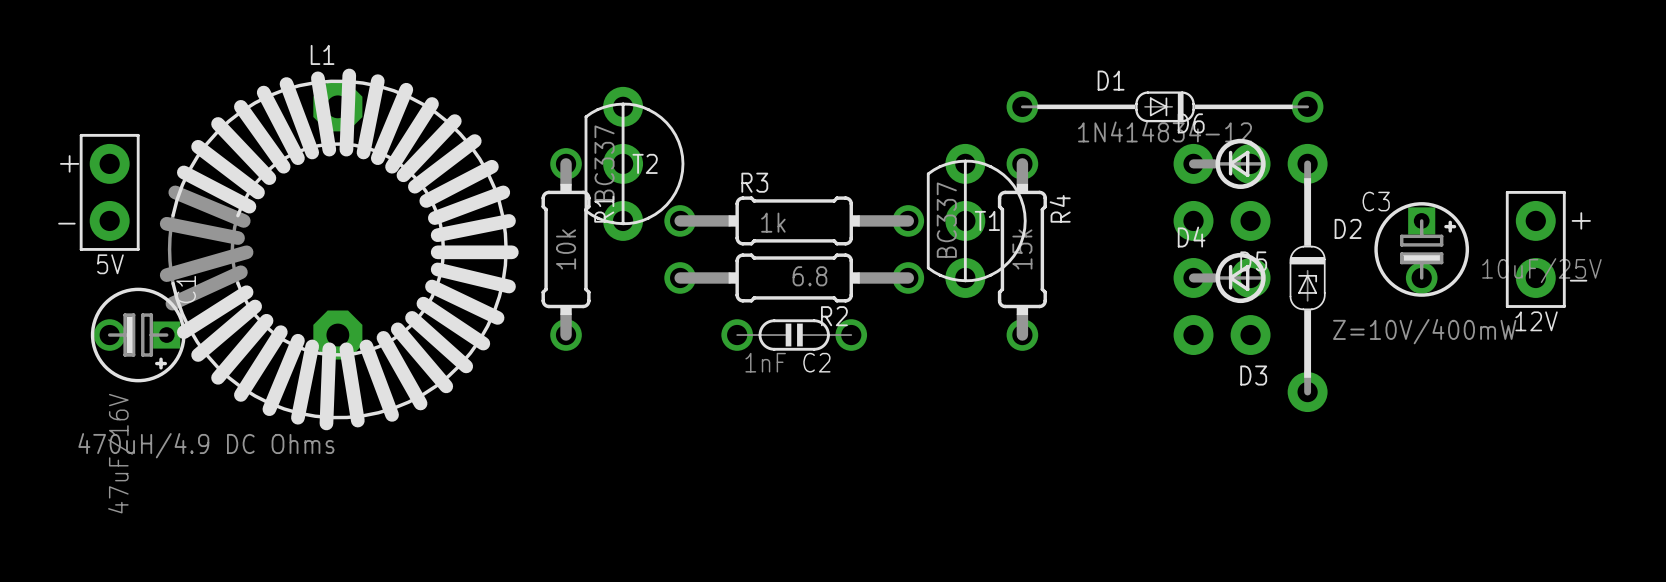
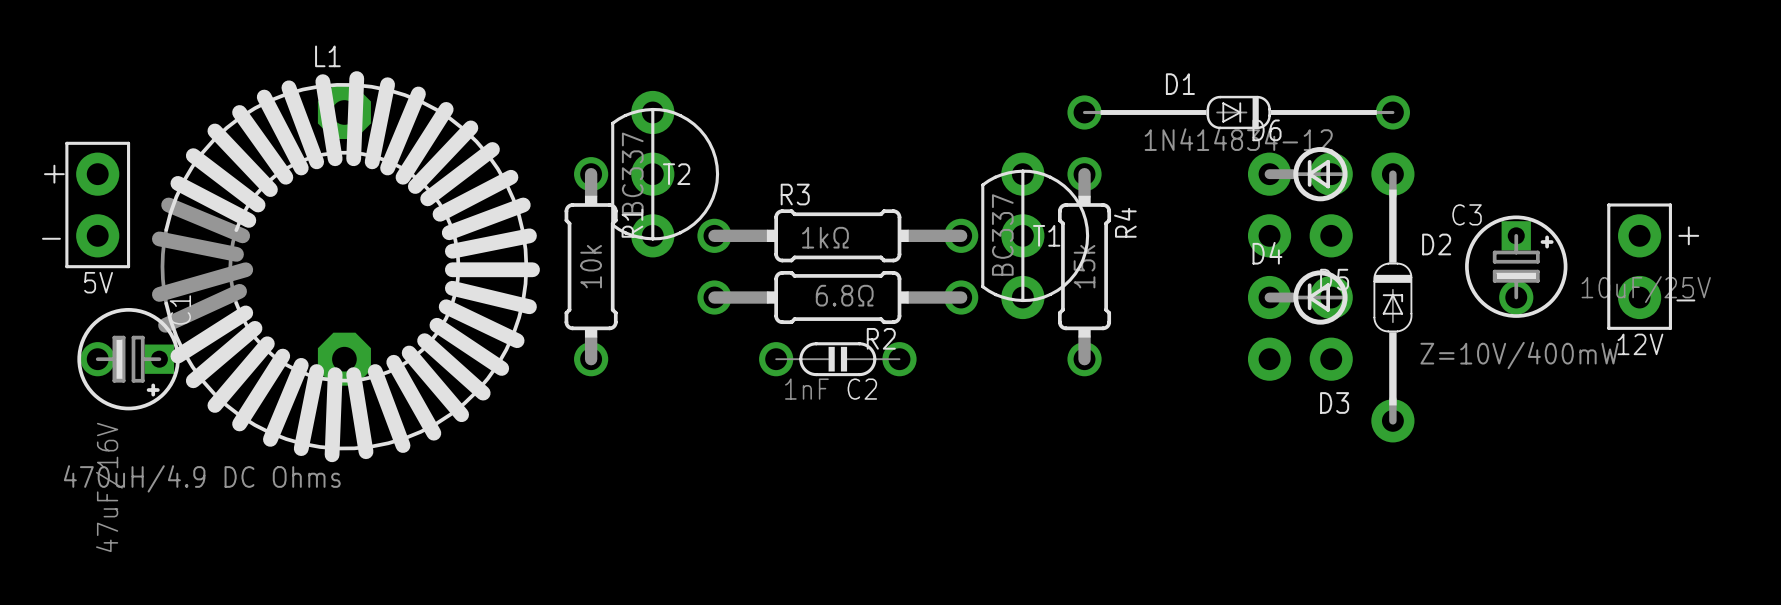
R3 value: 1k (773, 222) -> 1kΩ (825, 237)
R2 value: 6.8 (809, 276) -> 6.8Ω (844, 295)

